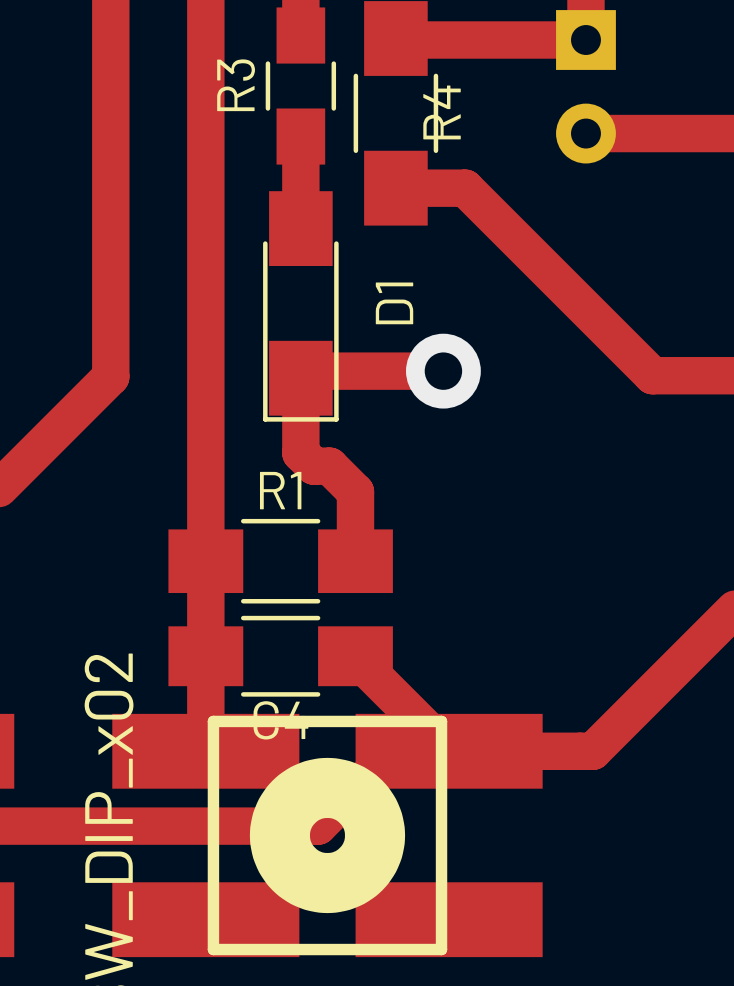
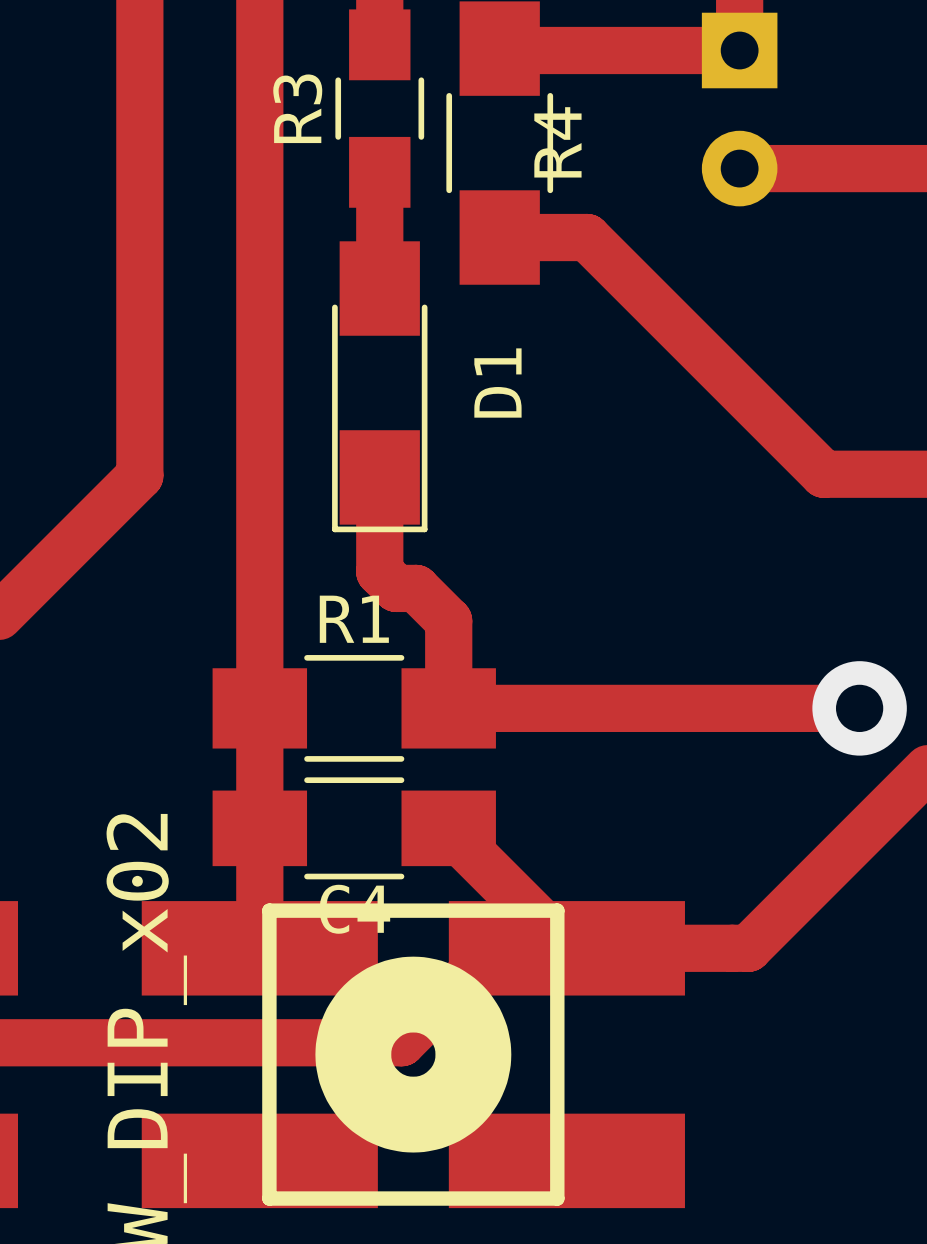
track: (443, 371) (307, 371) (300, 378) -> none
via: (443, 371) -> none
track: none -> (448, 708) (859, 708)
via: none -> (859, 708)

